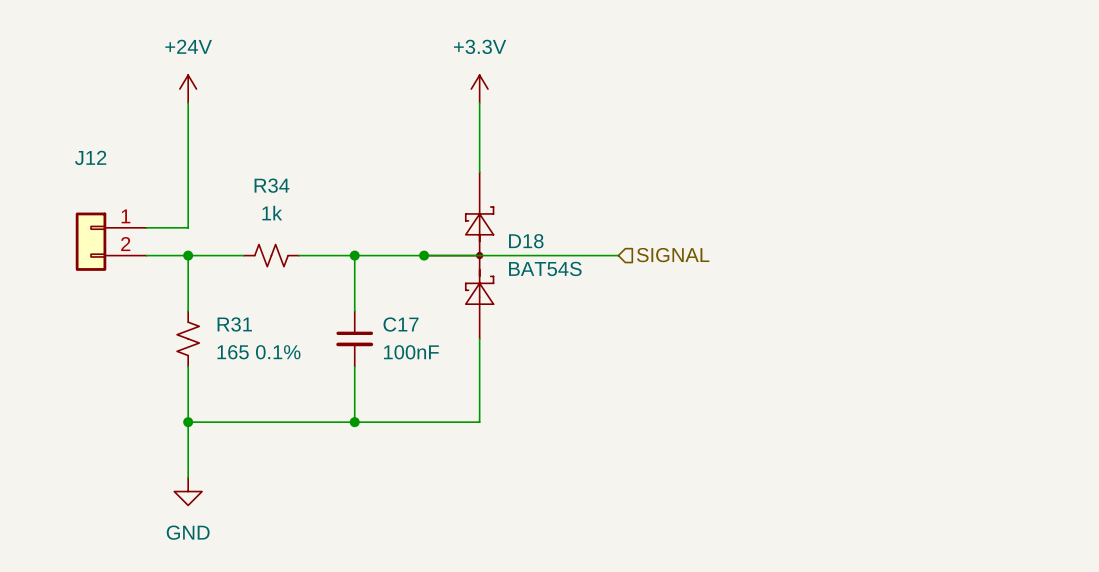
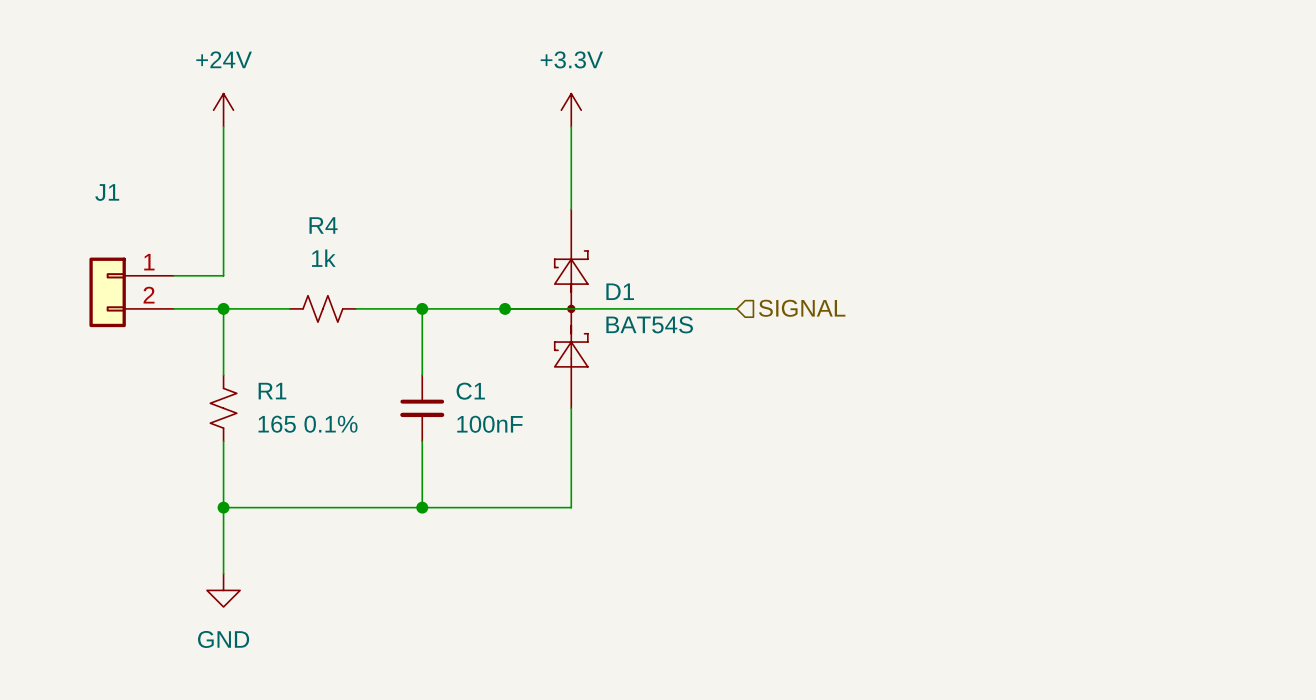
J12 name: J12 (90, 157) -> J1 (107, 192)
R34 name: R34 (271, 185) -> R4 (323, 225)
D18 name: D18 (526, 241) -> D1 (620, 291)
R31 name: R31 (234, 324) -> R1 (272, 391)
C17 name: C17 (400, 324) -> C1 (470, 391)

